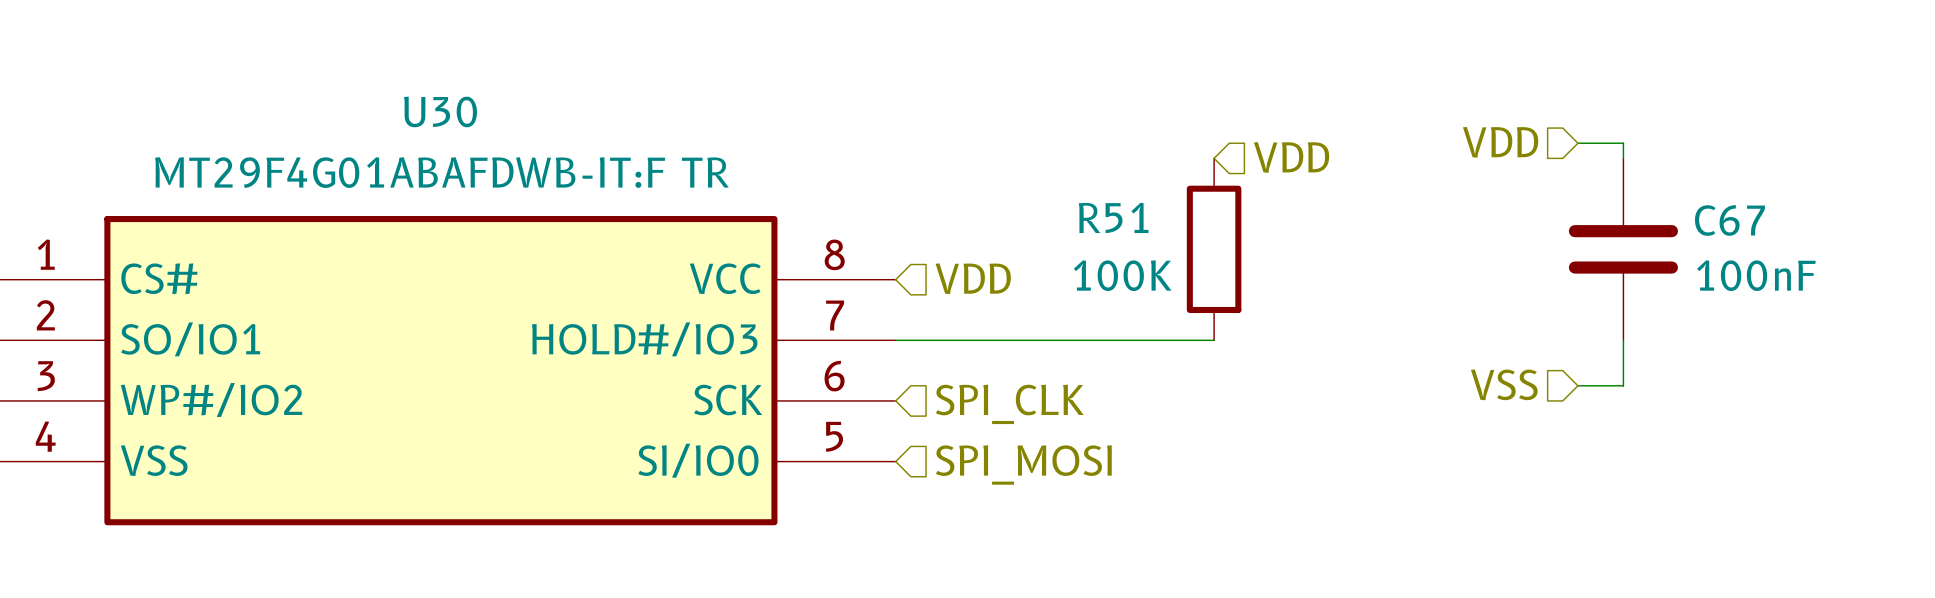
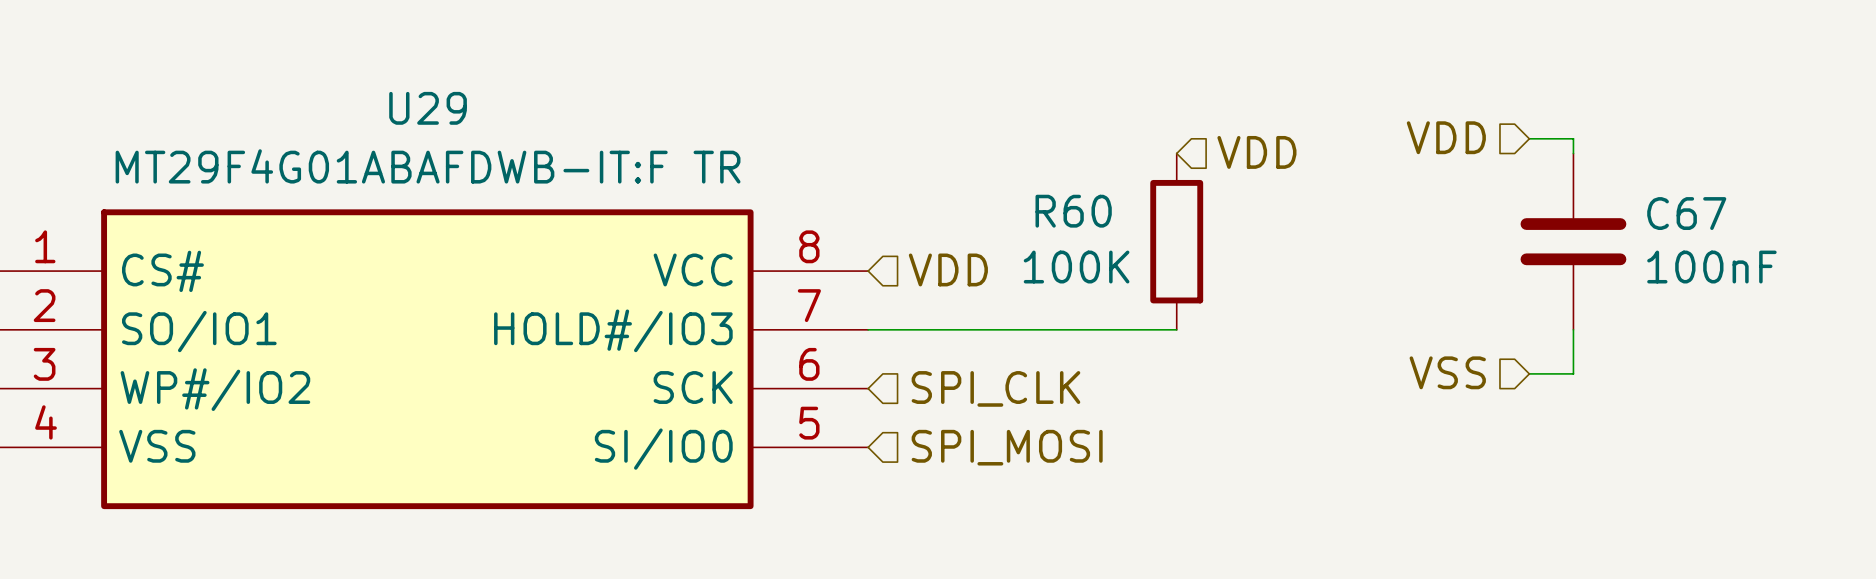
U30 name: U30 (440, 111) -> U29 (428, 108)
R51 name: R51 (1113, 217) -> R60 (1073, 211)

